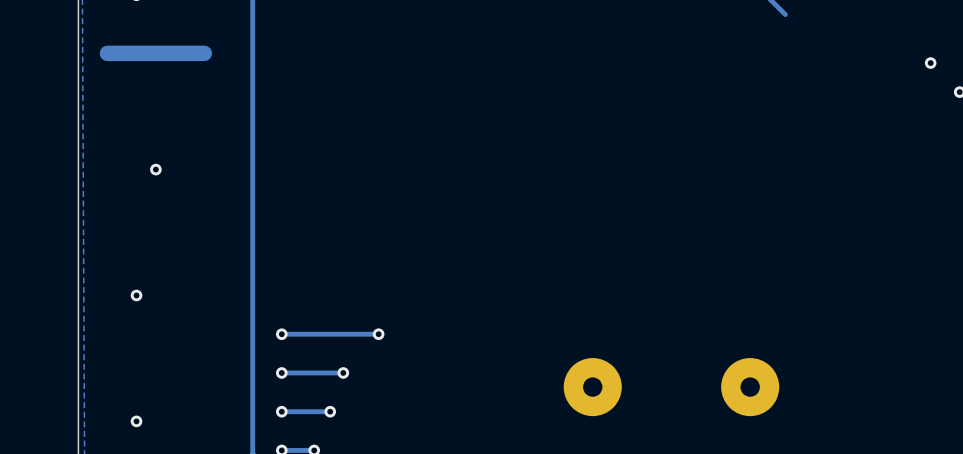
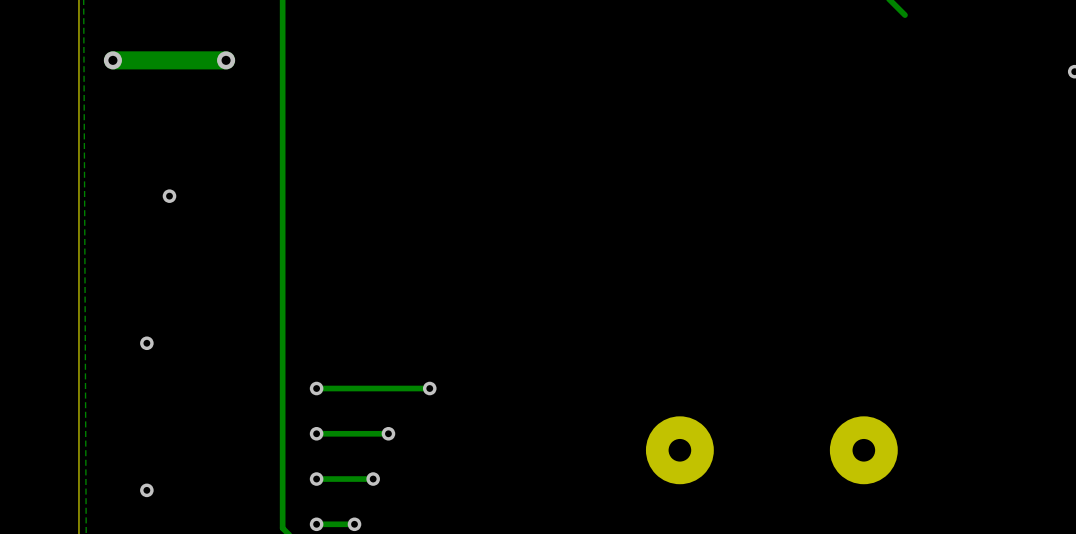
via: none -> (112, 60)
via: none -> (226, 60)

